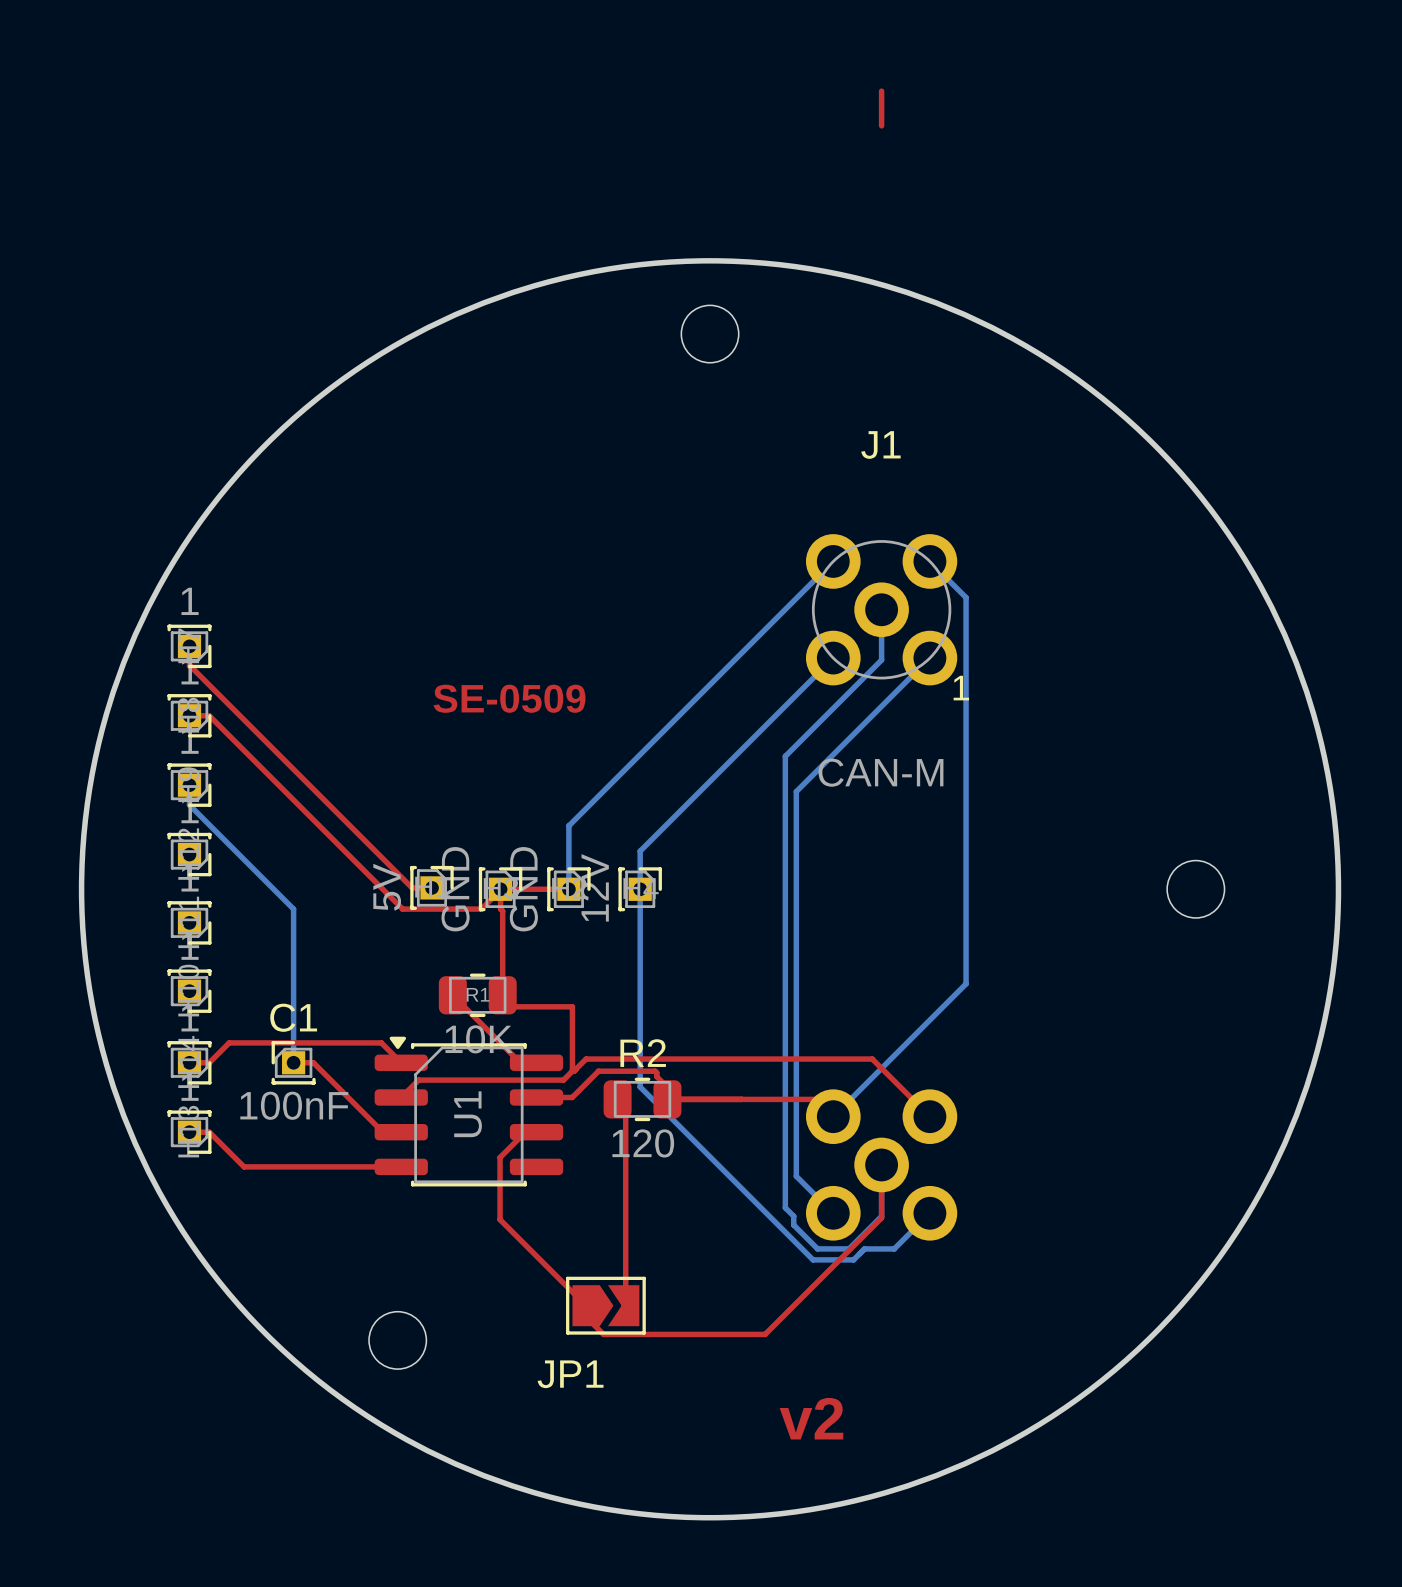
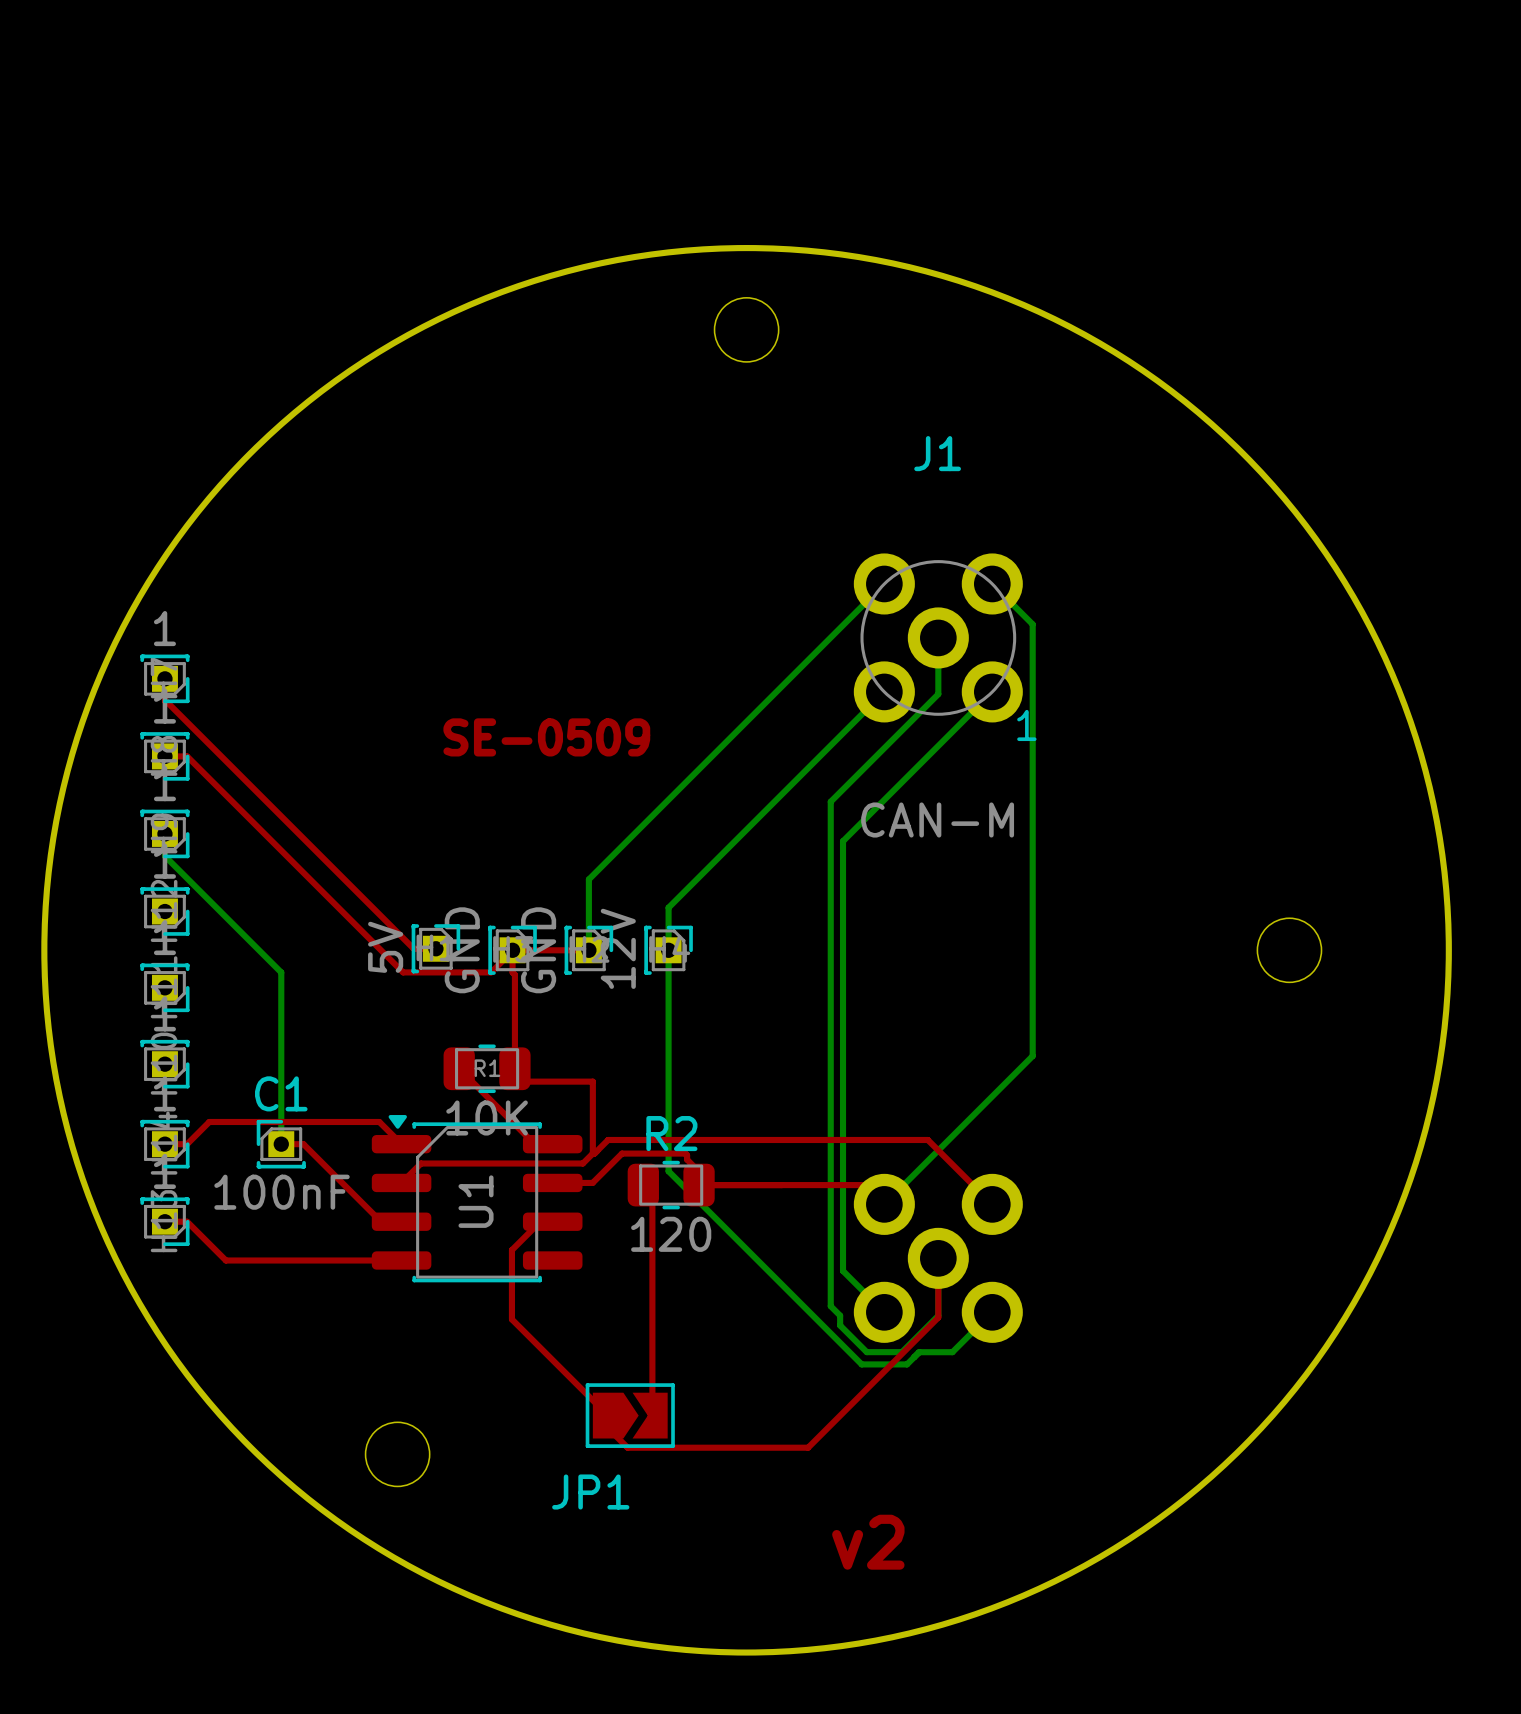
top track: (881, 91) (881, 125) -> none

